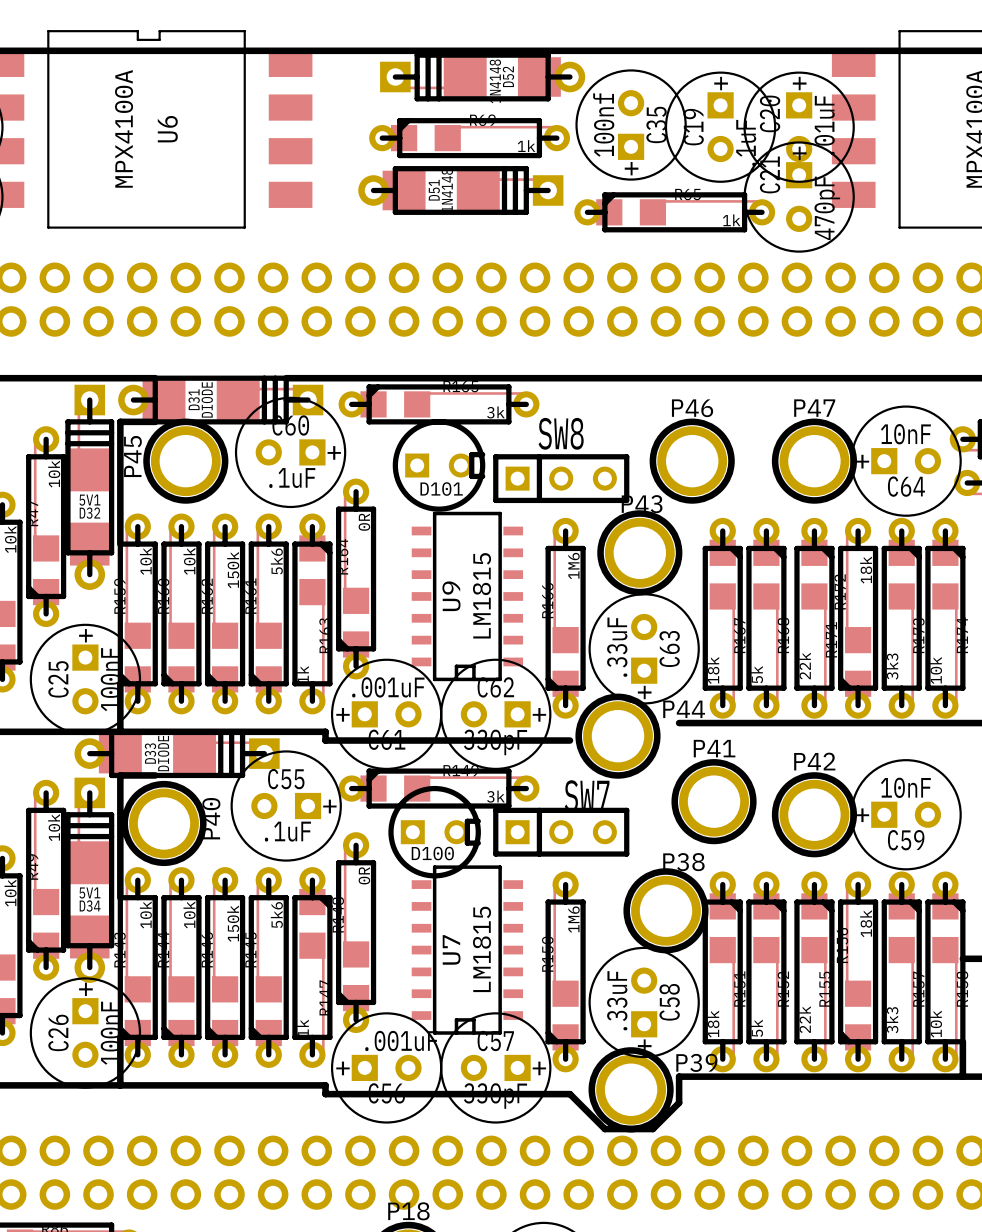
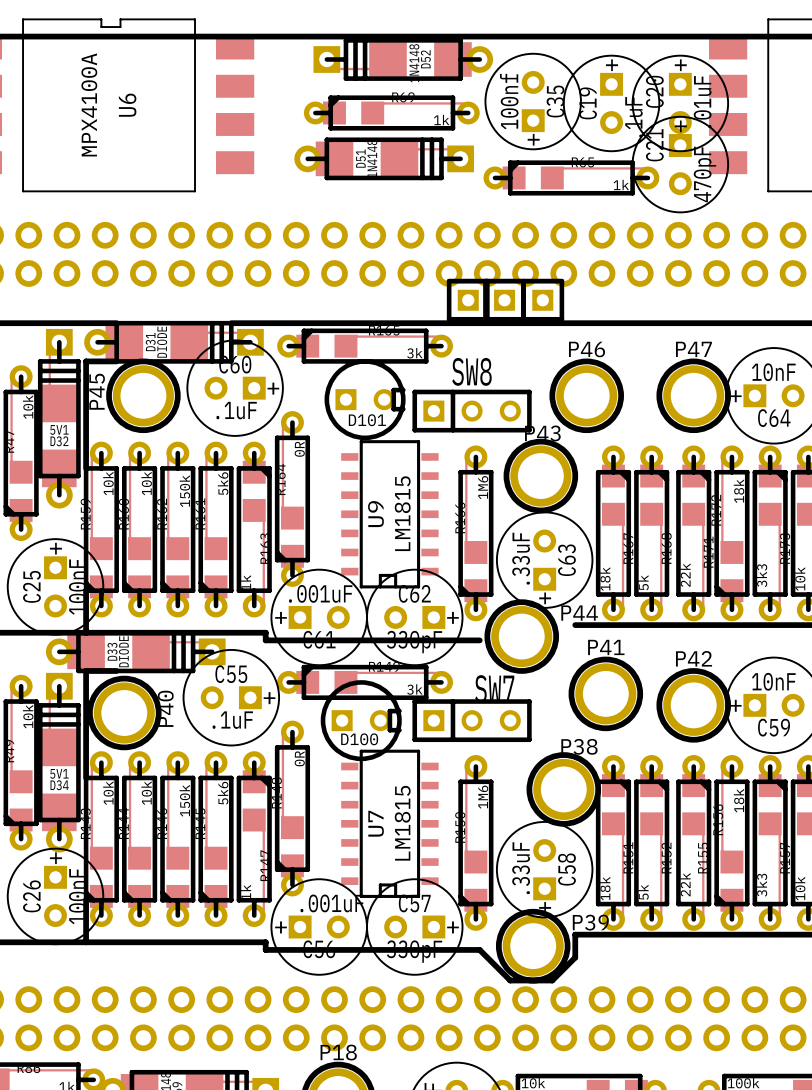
part: none -> (468, 300)
part: none -> (504, 300)
part: none -> (542, 300)

